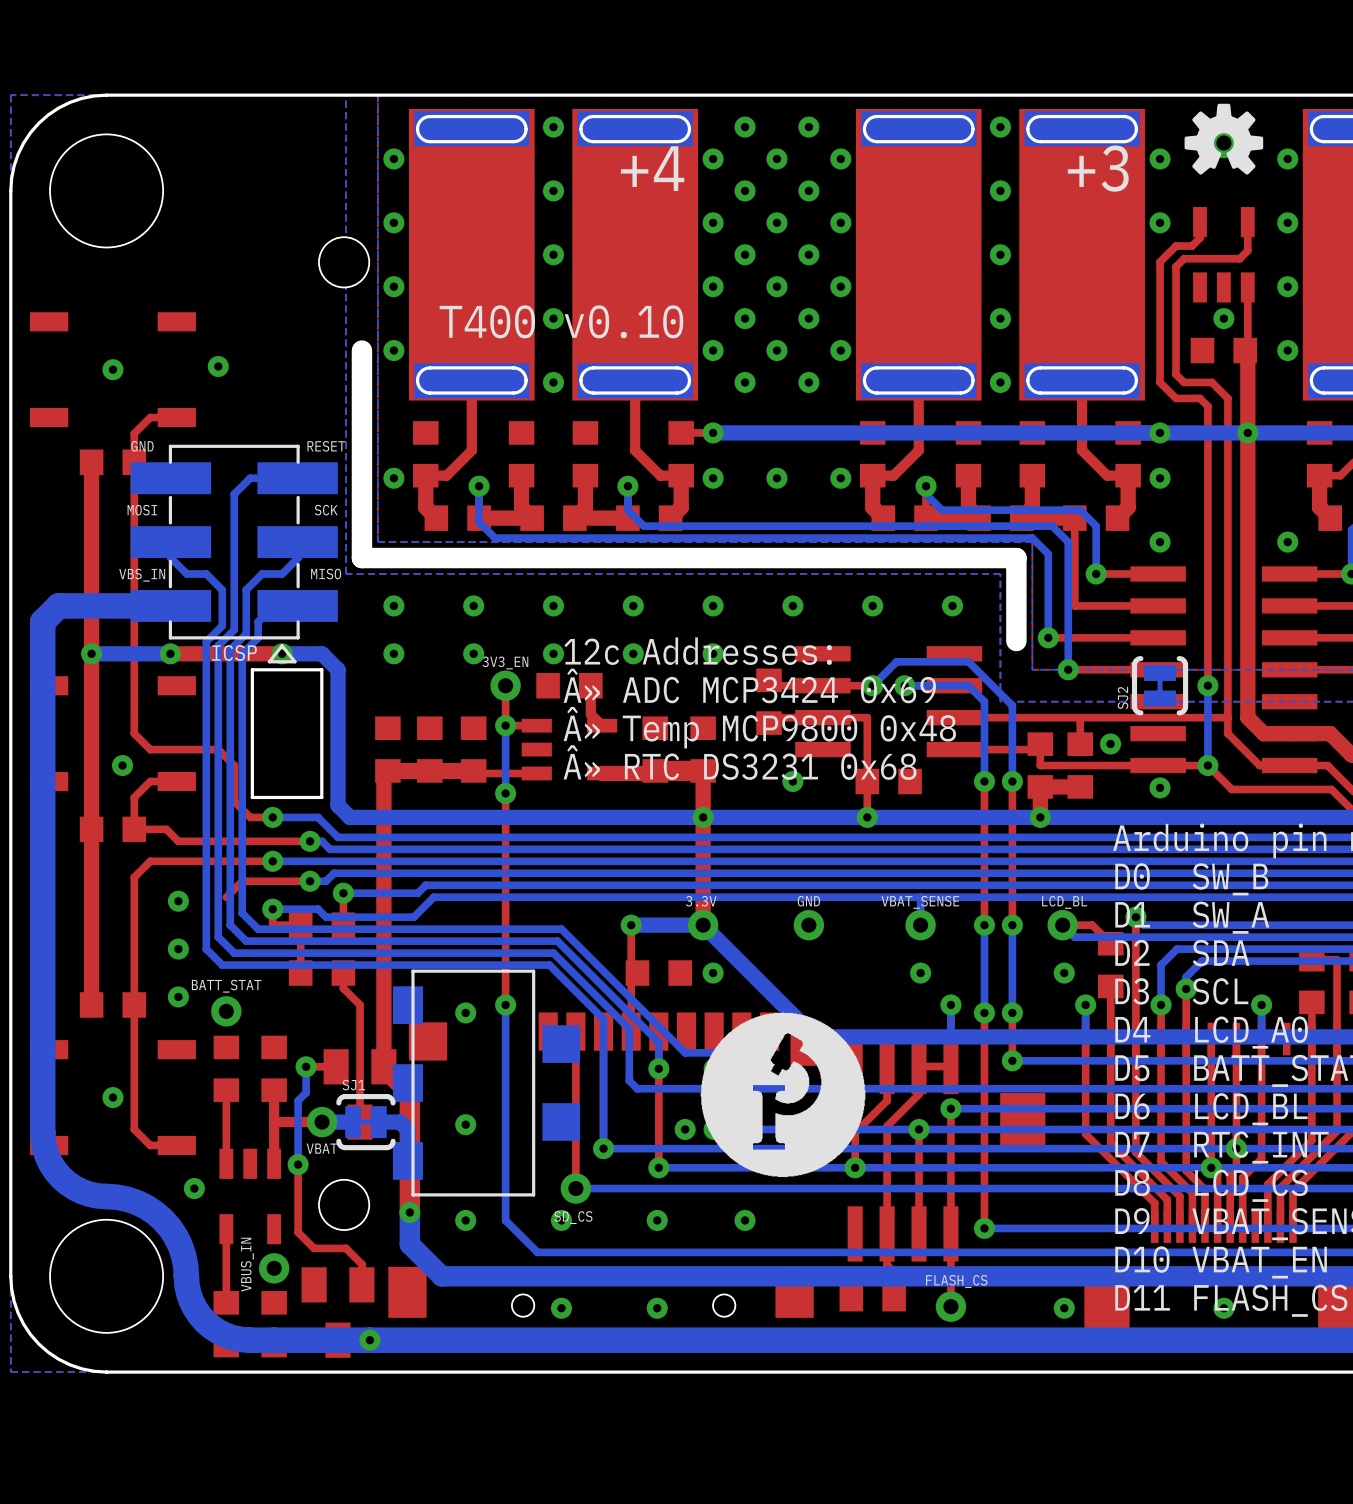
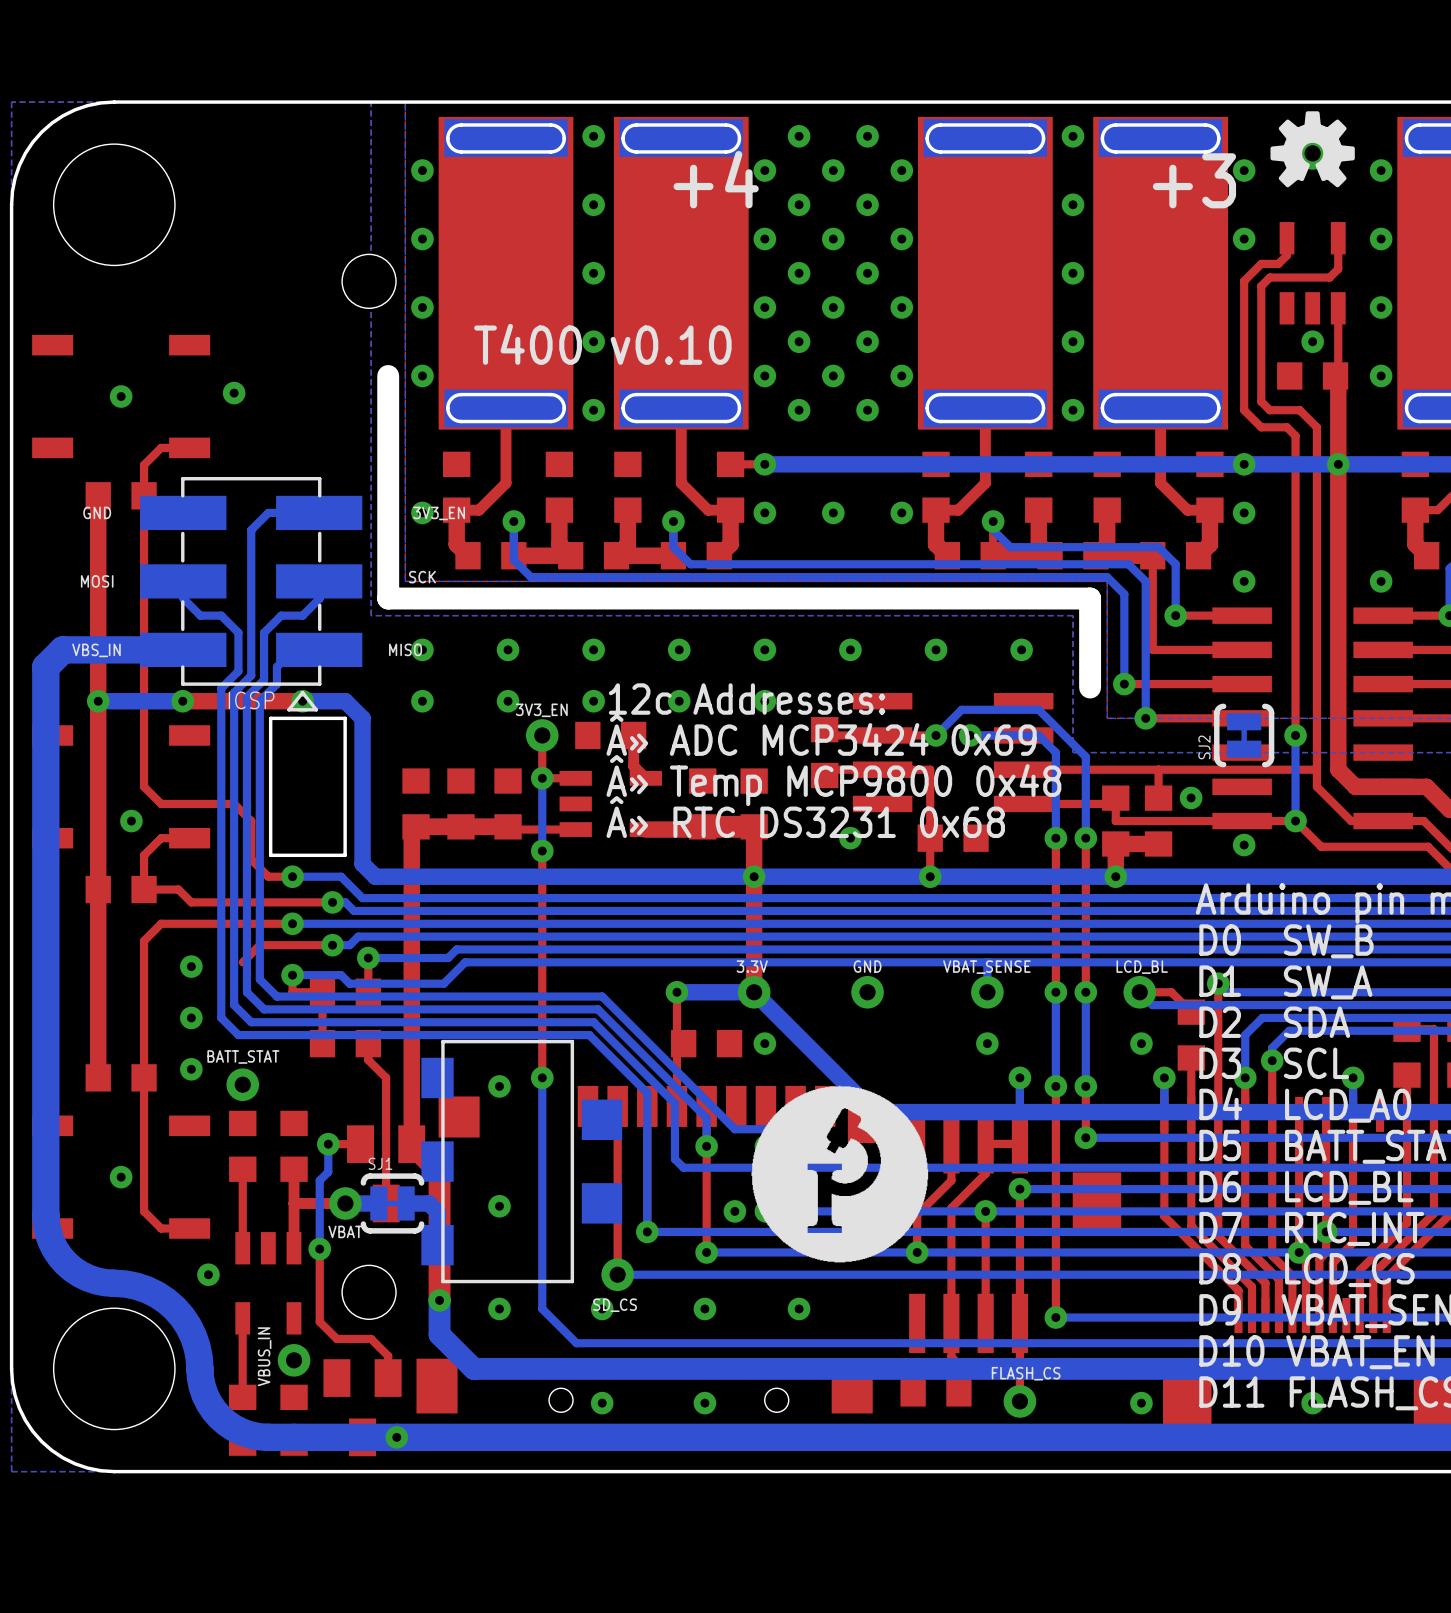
text position: GND (142, 446) -> GND (97, 512)
text: RESET (326, 446) -> none
text: none -> 3V3_EN (439, 513)
text position: MOSI (142, 510) -> MOSI (97, 581)
text position: SCK (326, 510) -> SCK (422, 577)
text position: MISO (326, 574) -> MISO (405, 649)
text position: VBS_IN (142, 575) -> VBS_IN (96, 650)

